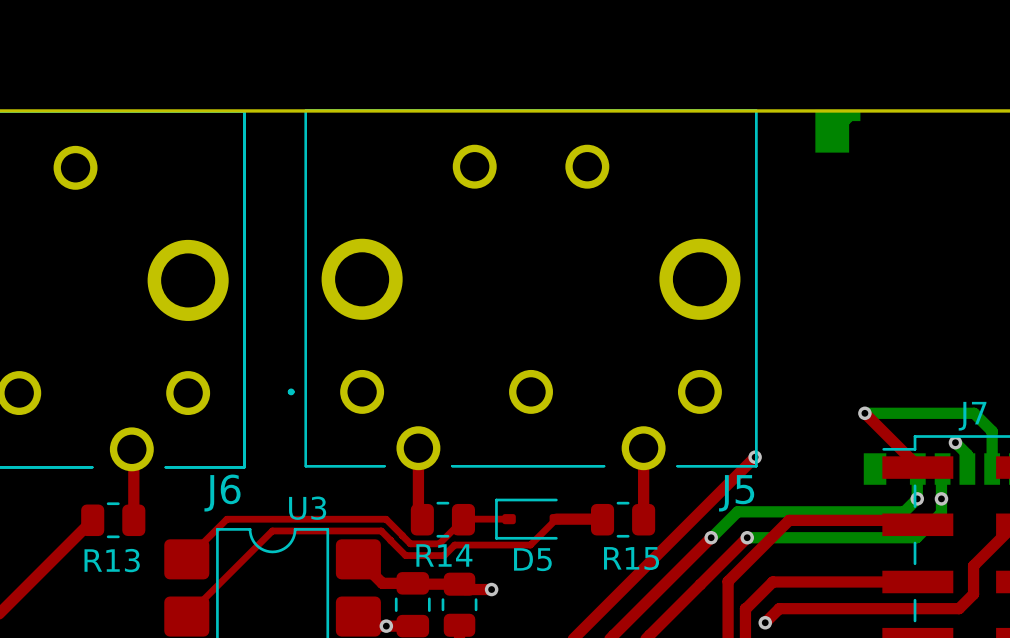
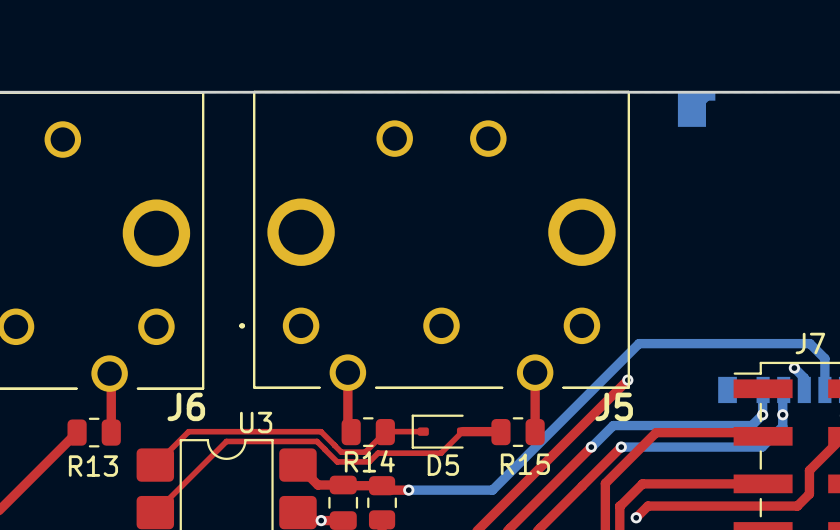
top track: (864, 413) (917, 467) -> none
bottom track: none -> (719, 343) (639, 343) (492, 490) (408, 490)
via: (864, 413) -> none

